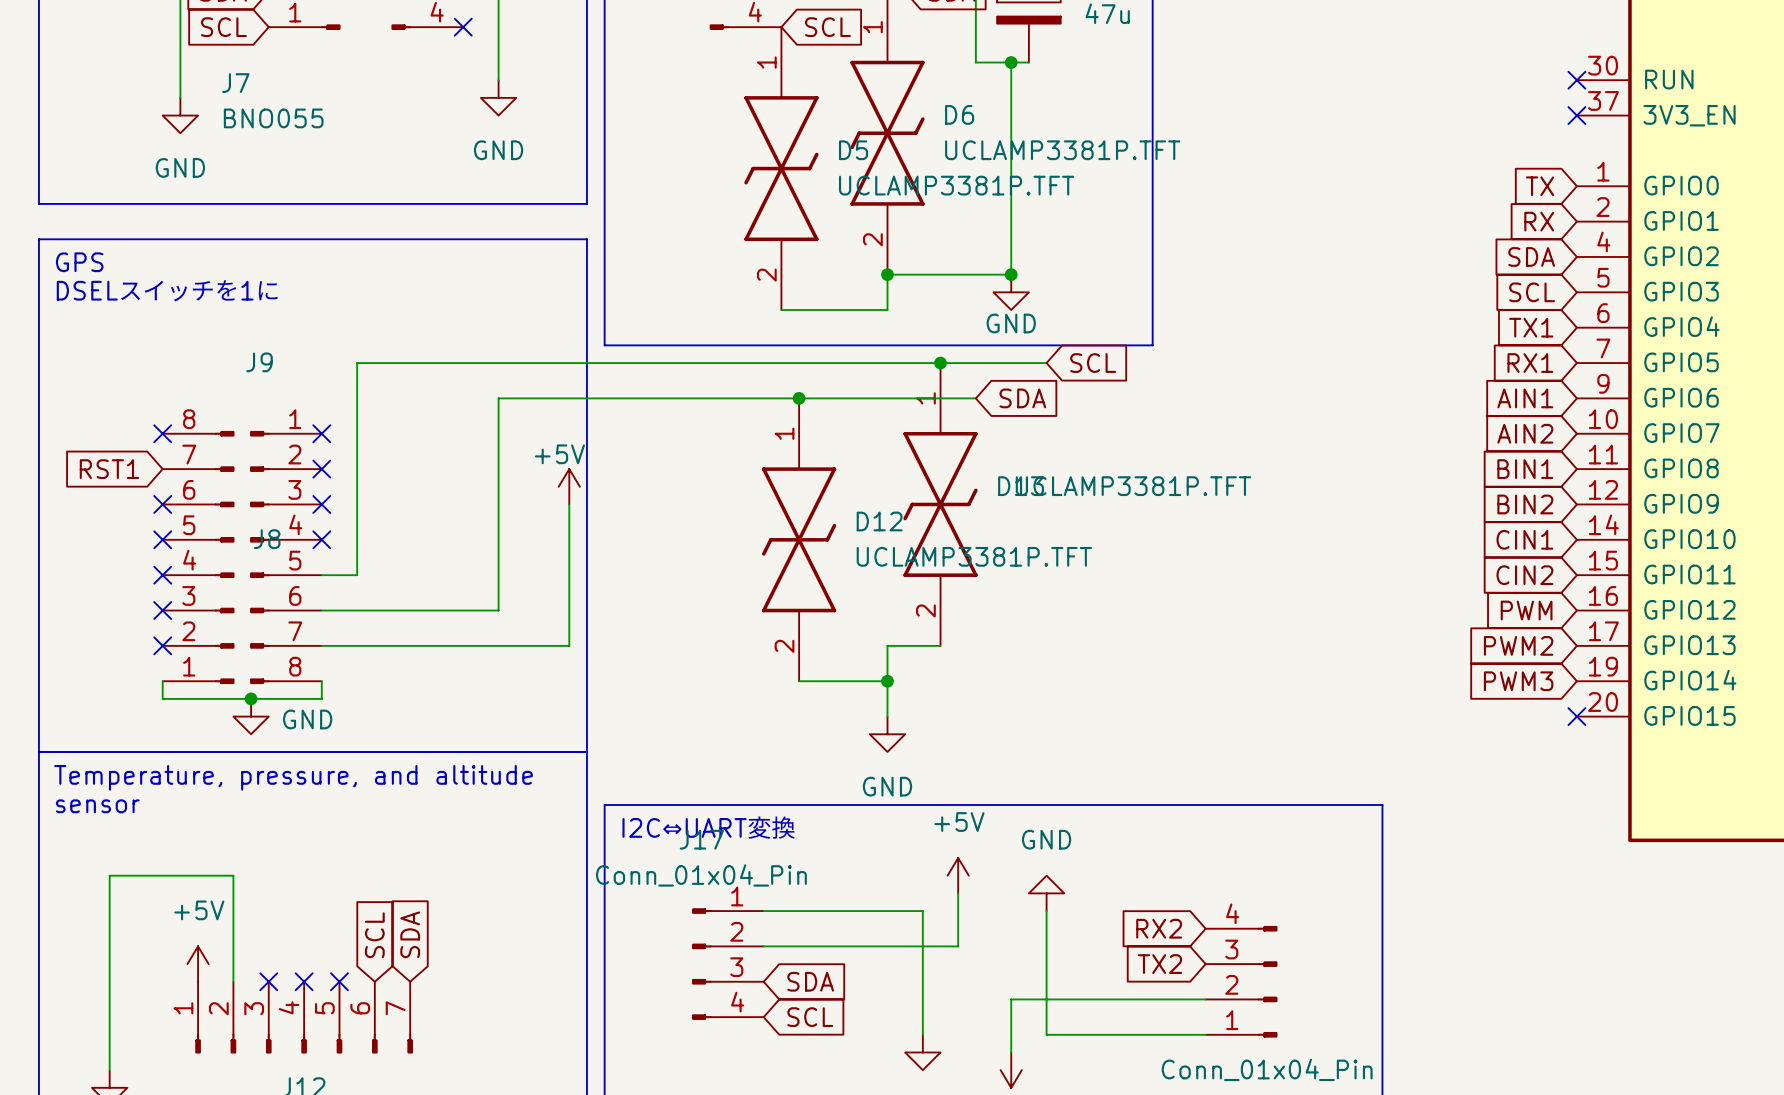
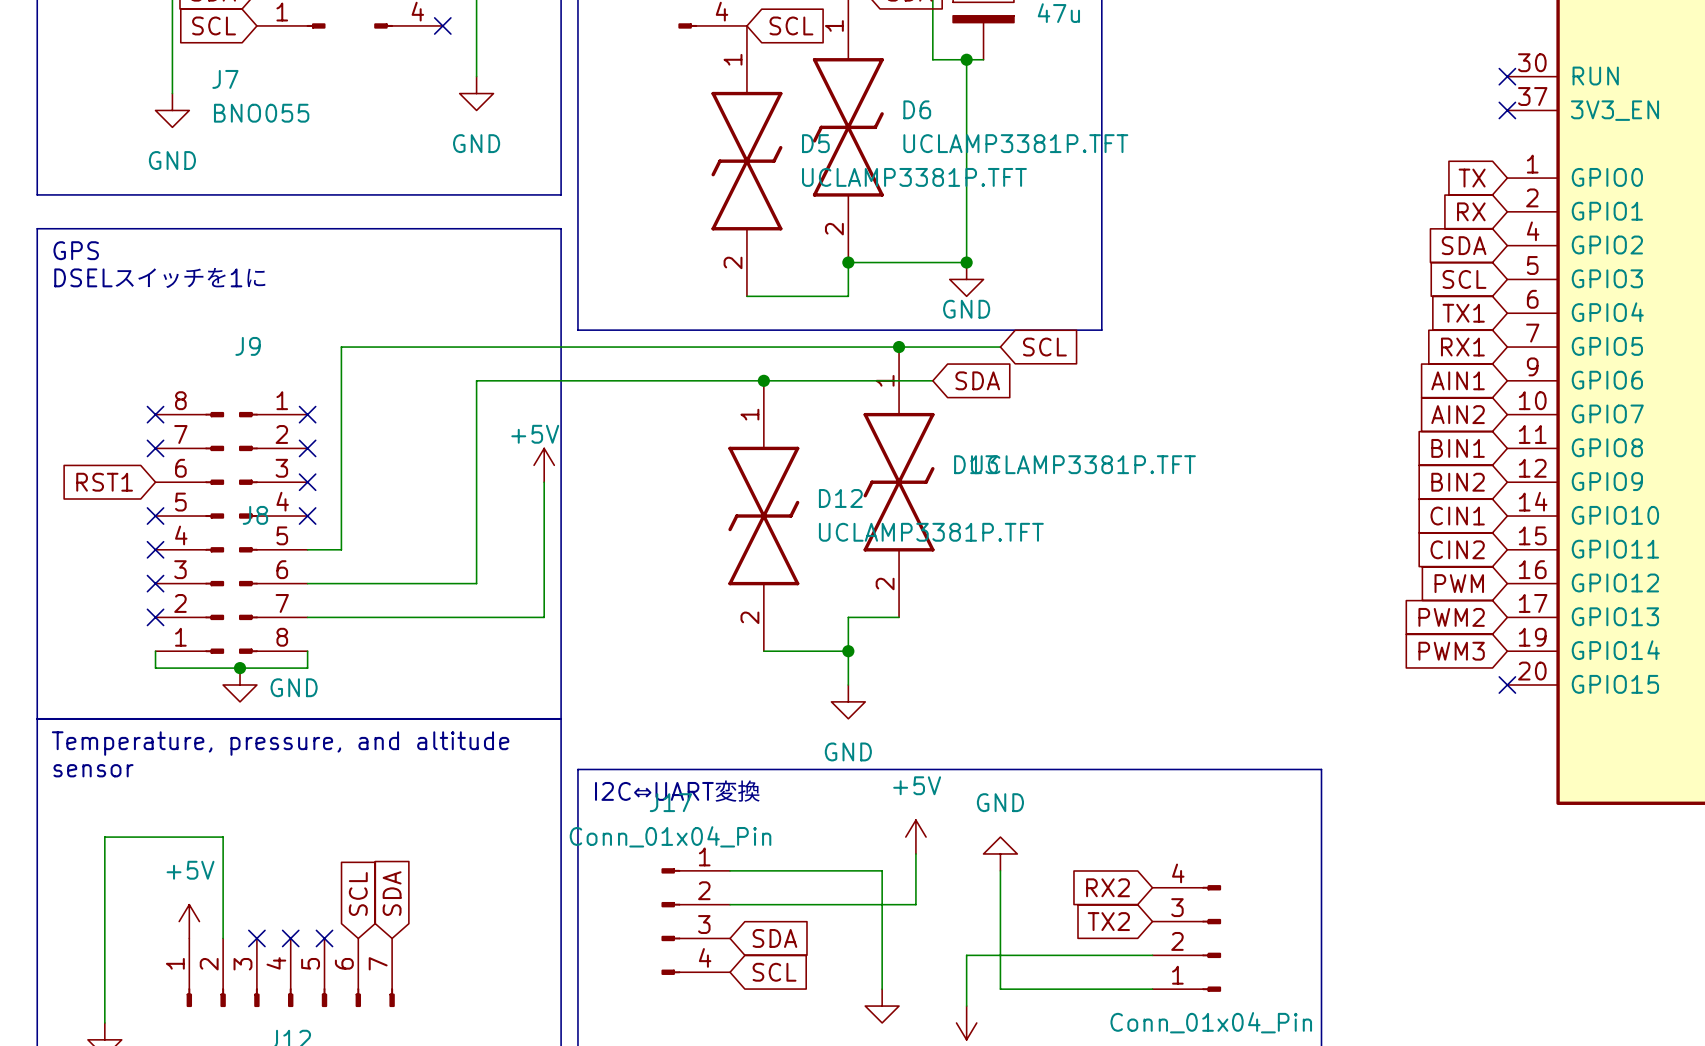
global label position: RST1 (109, 469) -> RST1 (104, 482)
no-connect mark position: (162, 504) -> (155, 448)

